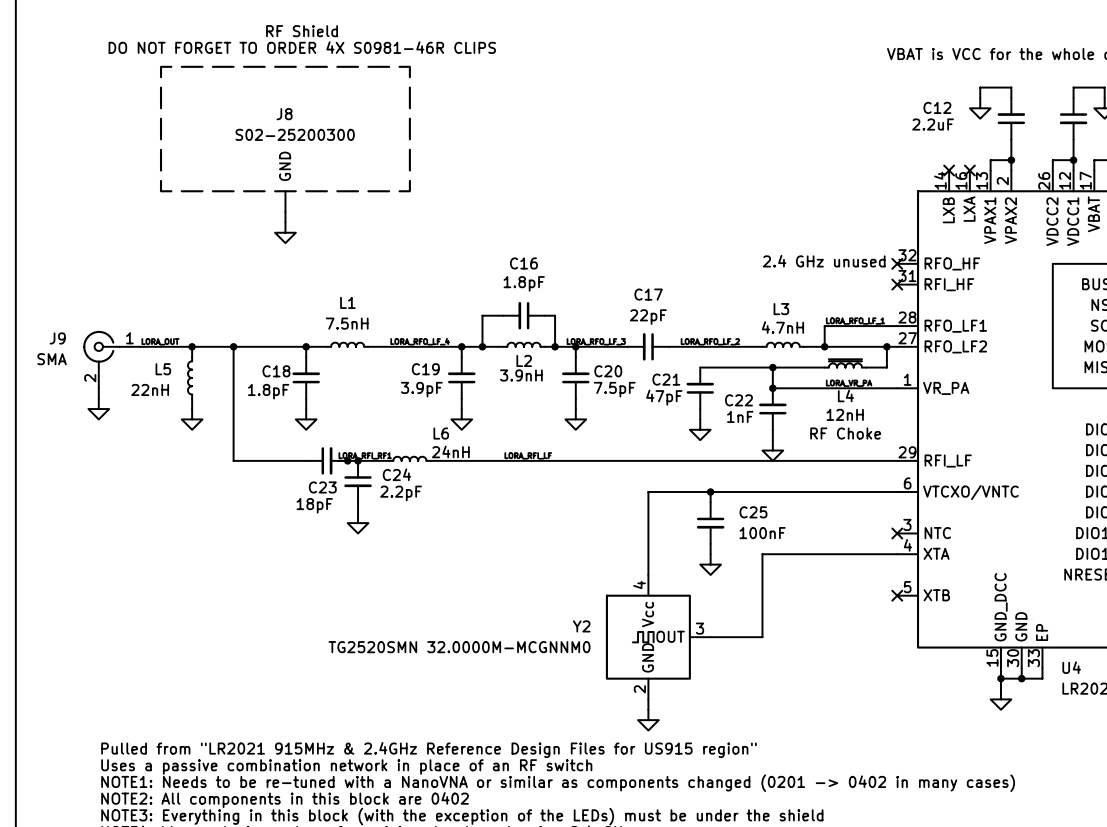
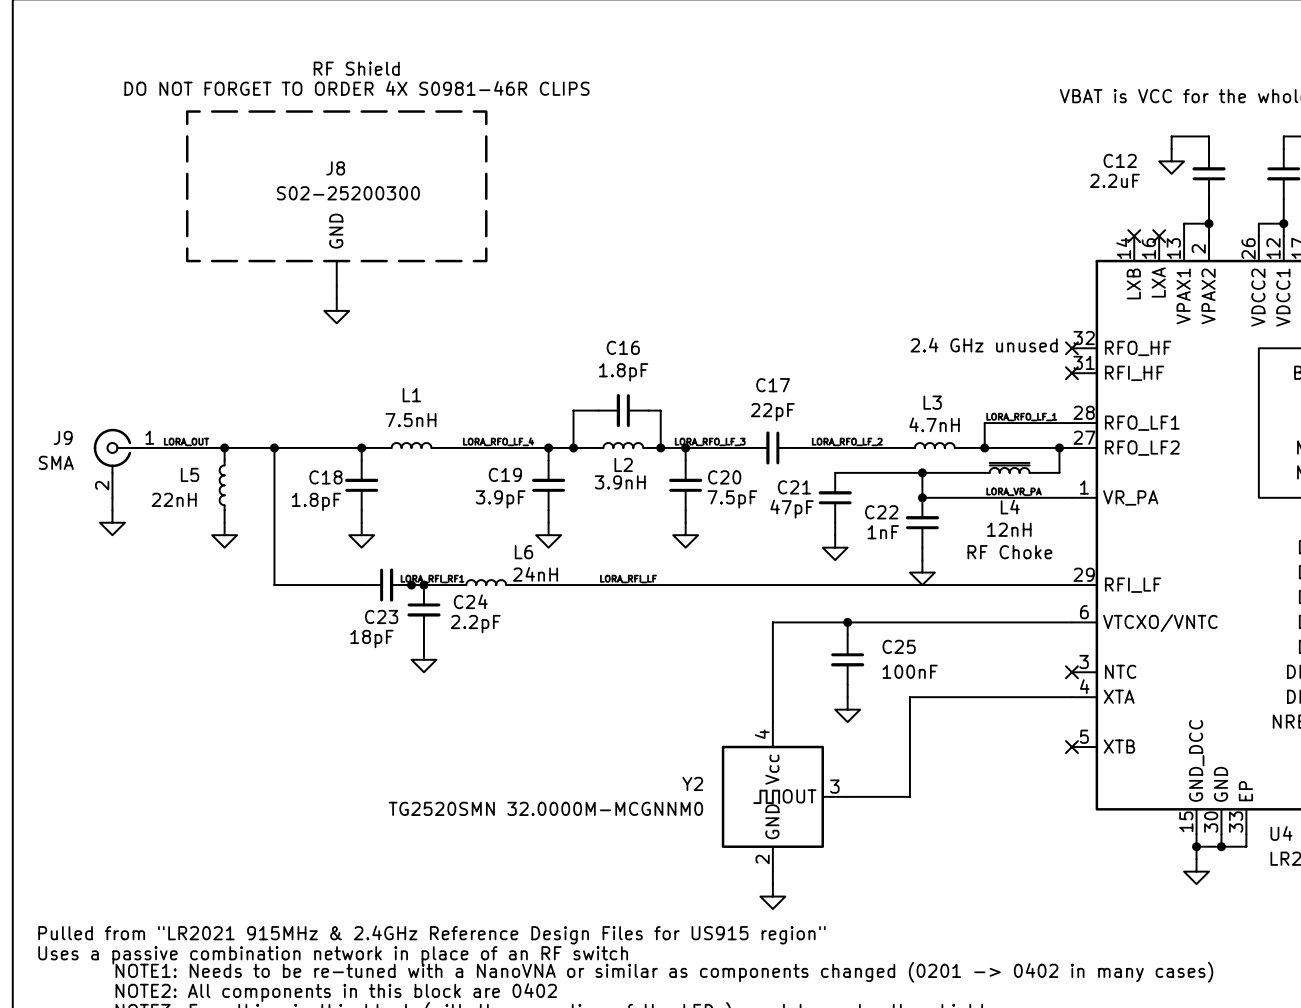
text position: Pulled from "LR2021 915MHz & 2.4GHz Reference Design Files for US915 region" (428, 750) -> Pulled from "LR2021 915MHz & 2.4GHz Reference Design Files for US915 region" (431, 934)
text position: Uses a passive combination network in place of an RF switch (346, 766) -> Uses a passive combination network in place of an RF switch (333, 955)

